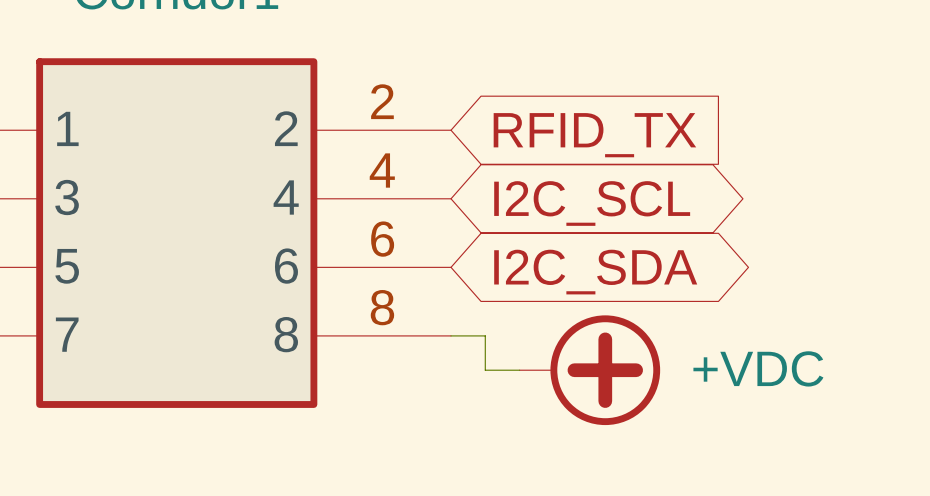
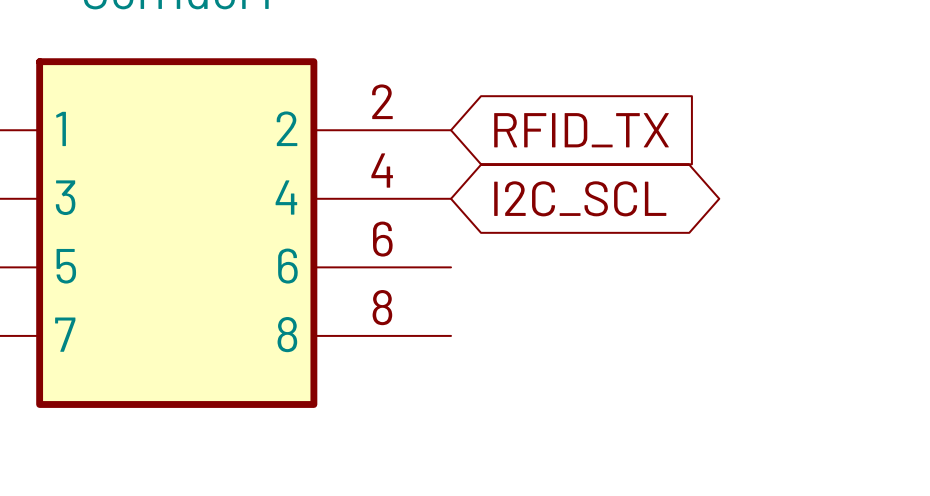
global label: I2C_SDA (595, 272) -> none
wire: (451, 335) (485, 335) (485, 370) (519, 370) -> none
power symbol: +VDC (589, 370) -> none

